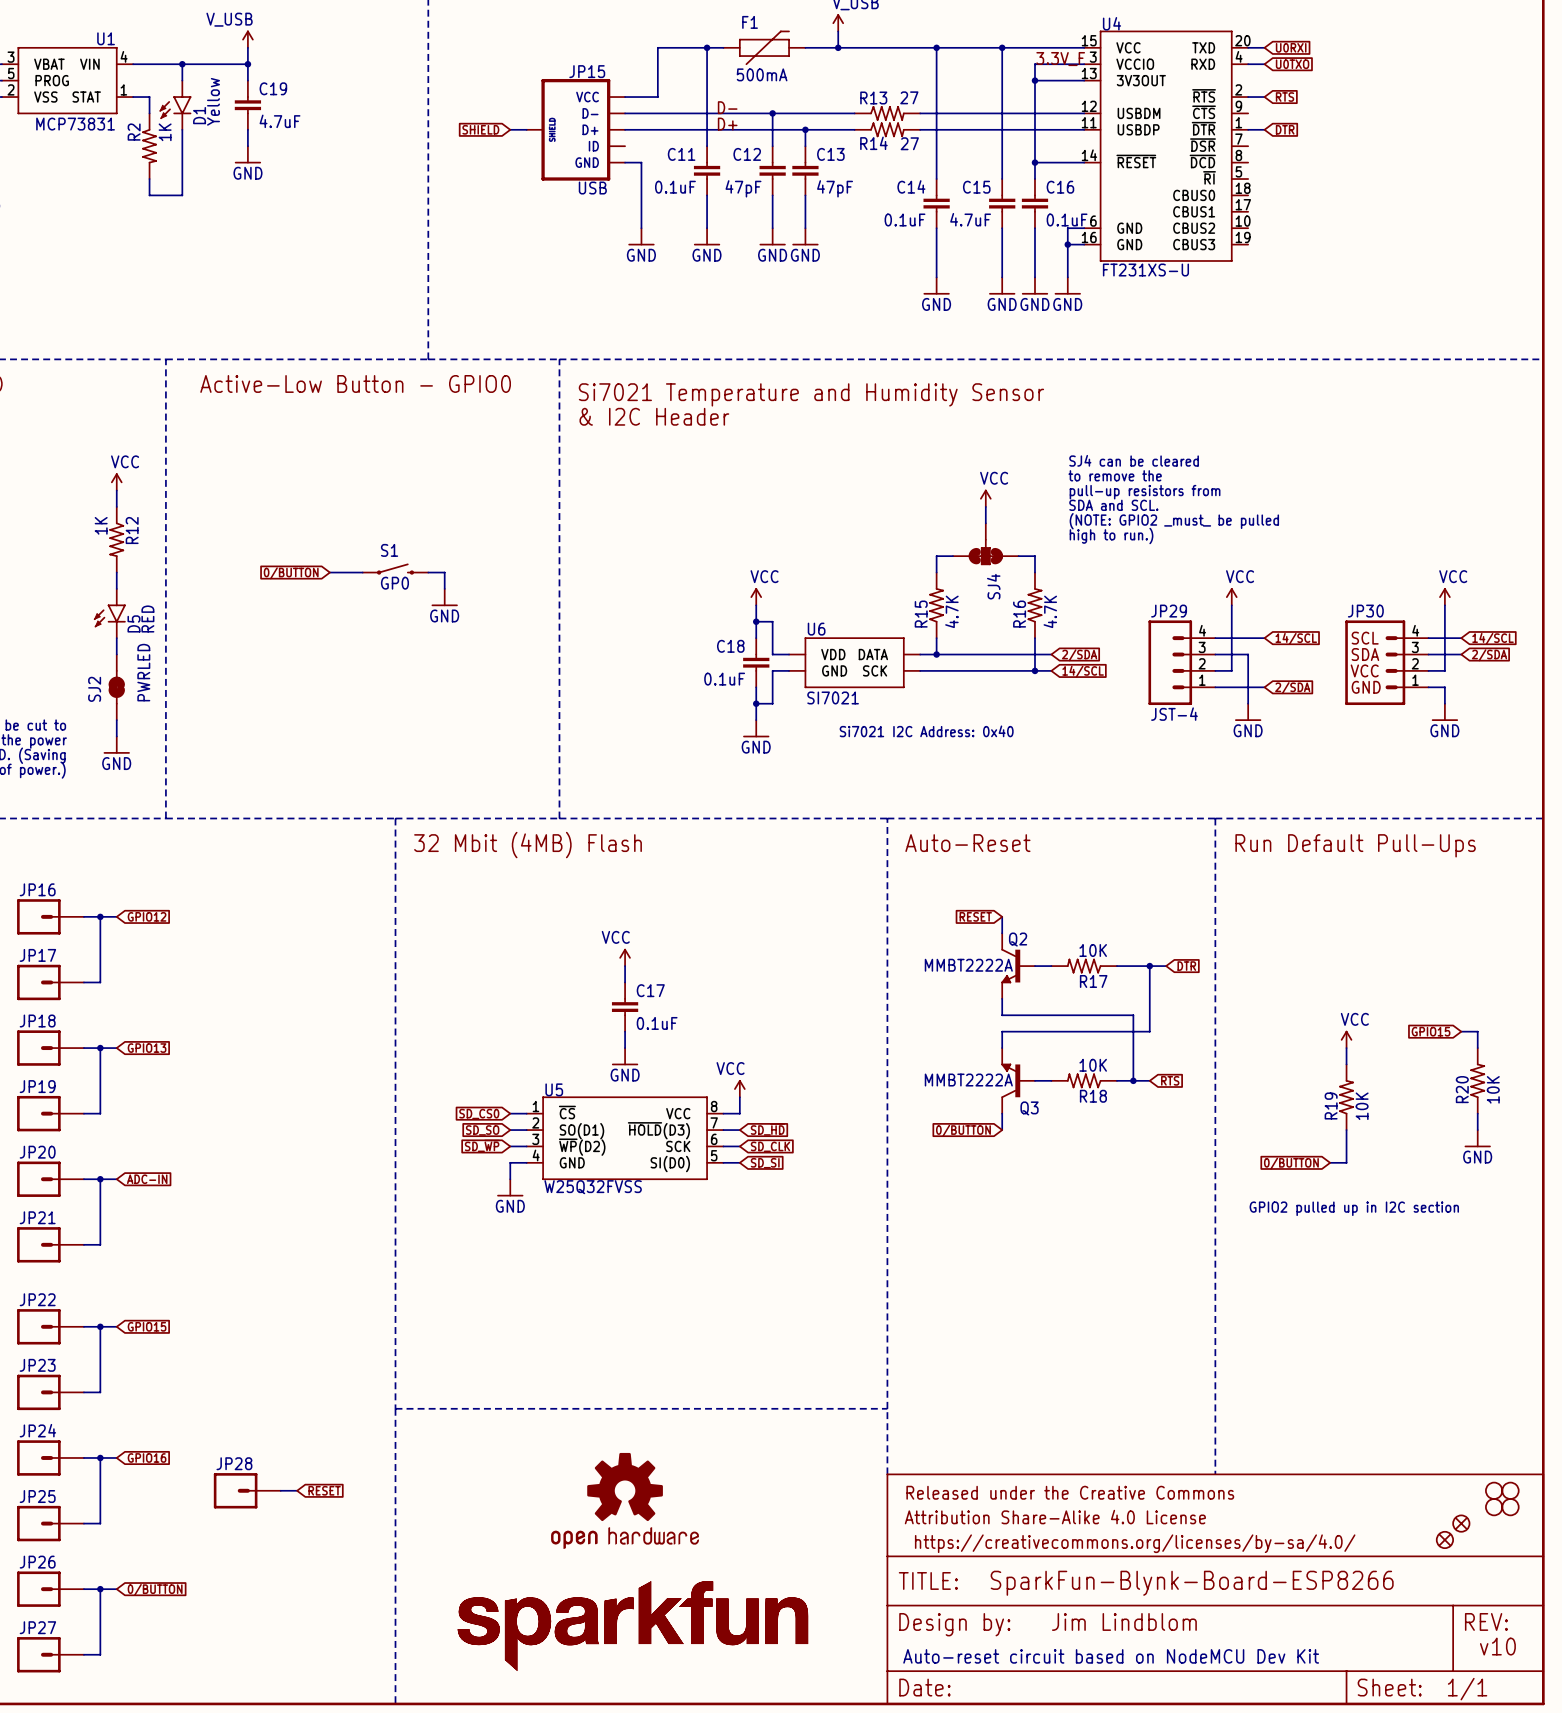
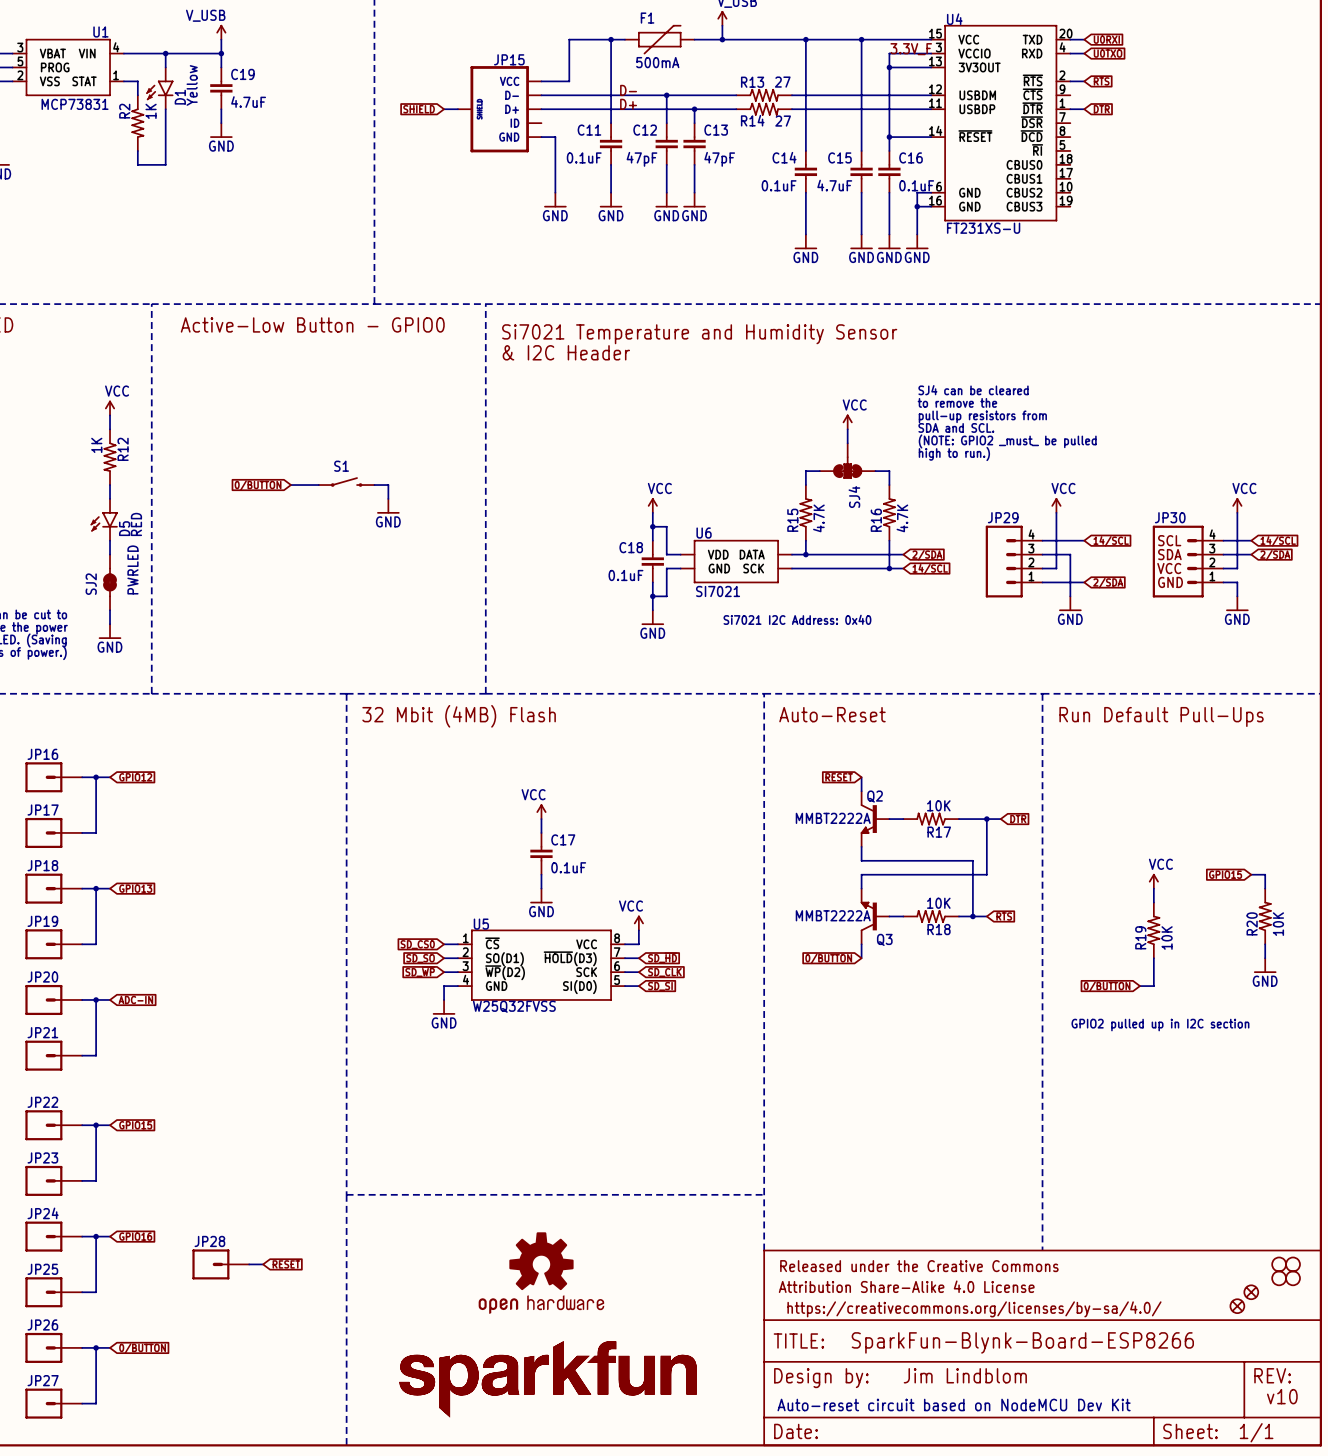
JP15 value: USB (592, 188) -> none
S1 value: GP0 (394, 583) -> none
JP29 value: JST-4 (1174, 714) -> none

